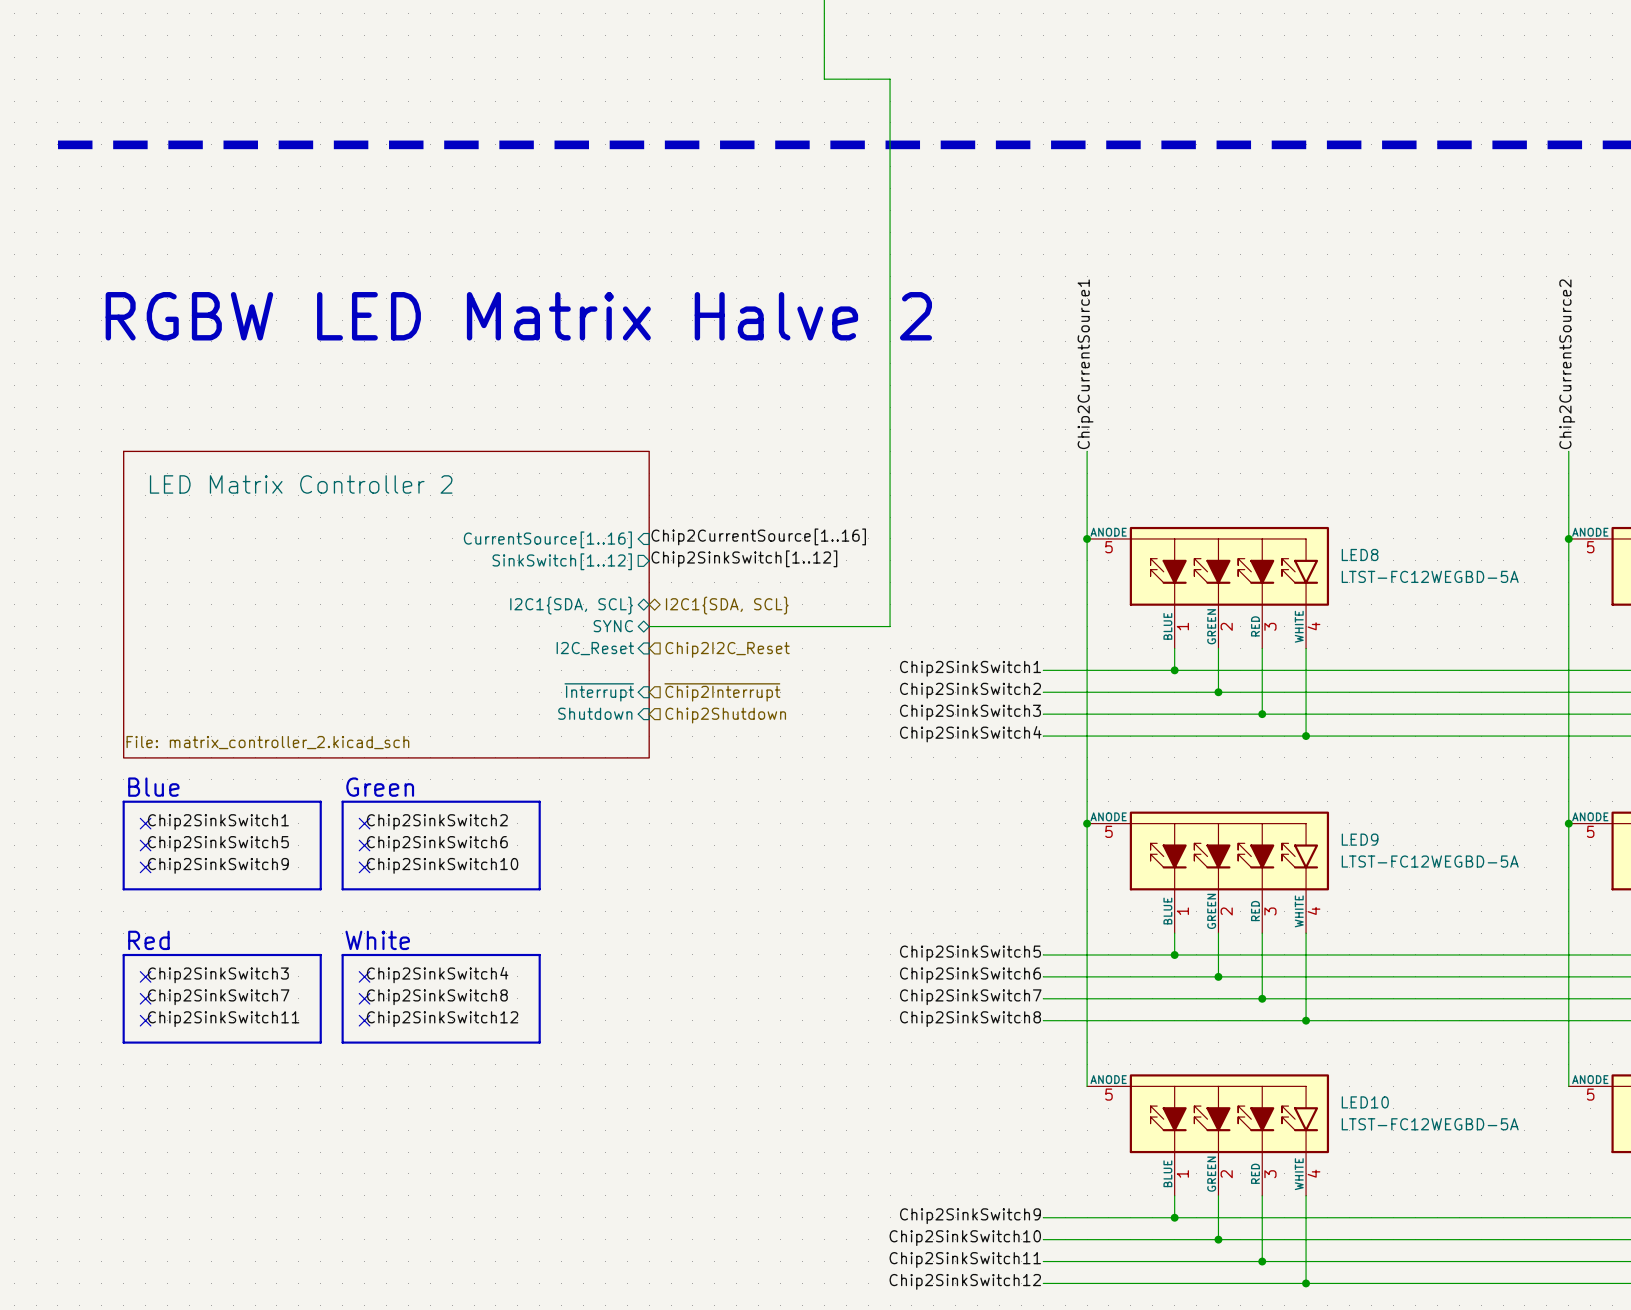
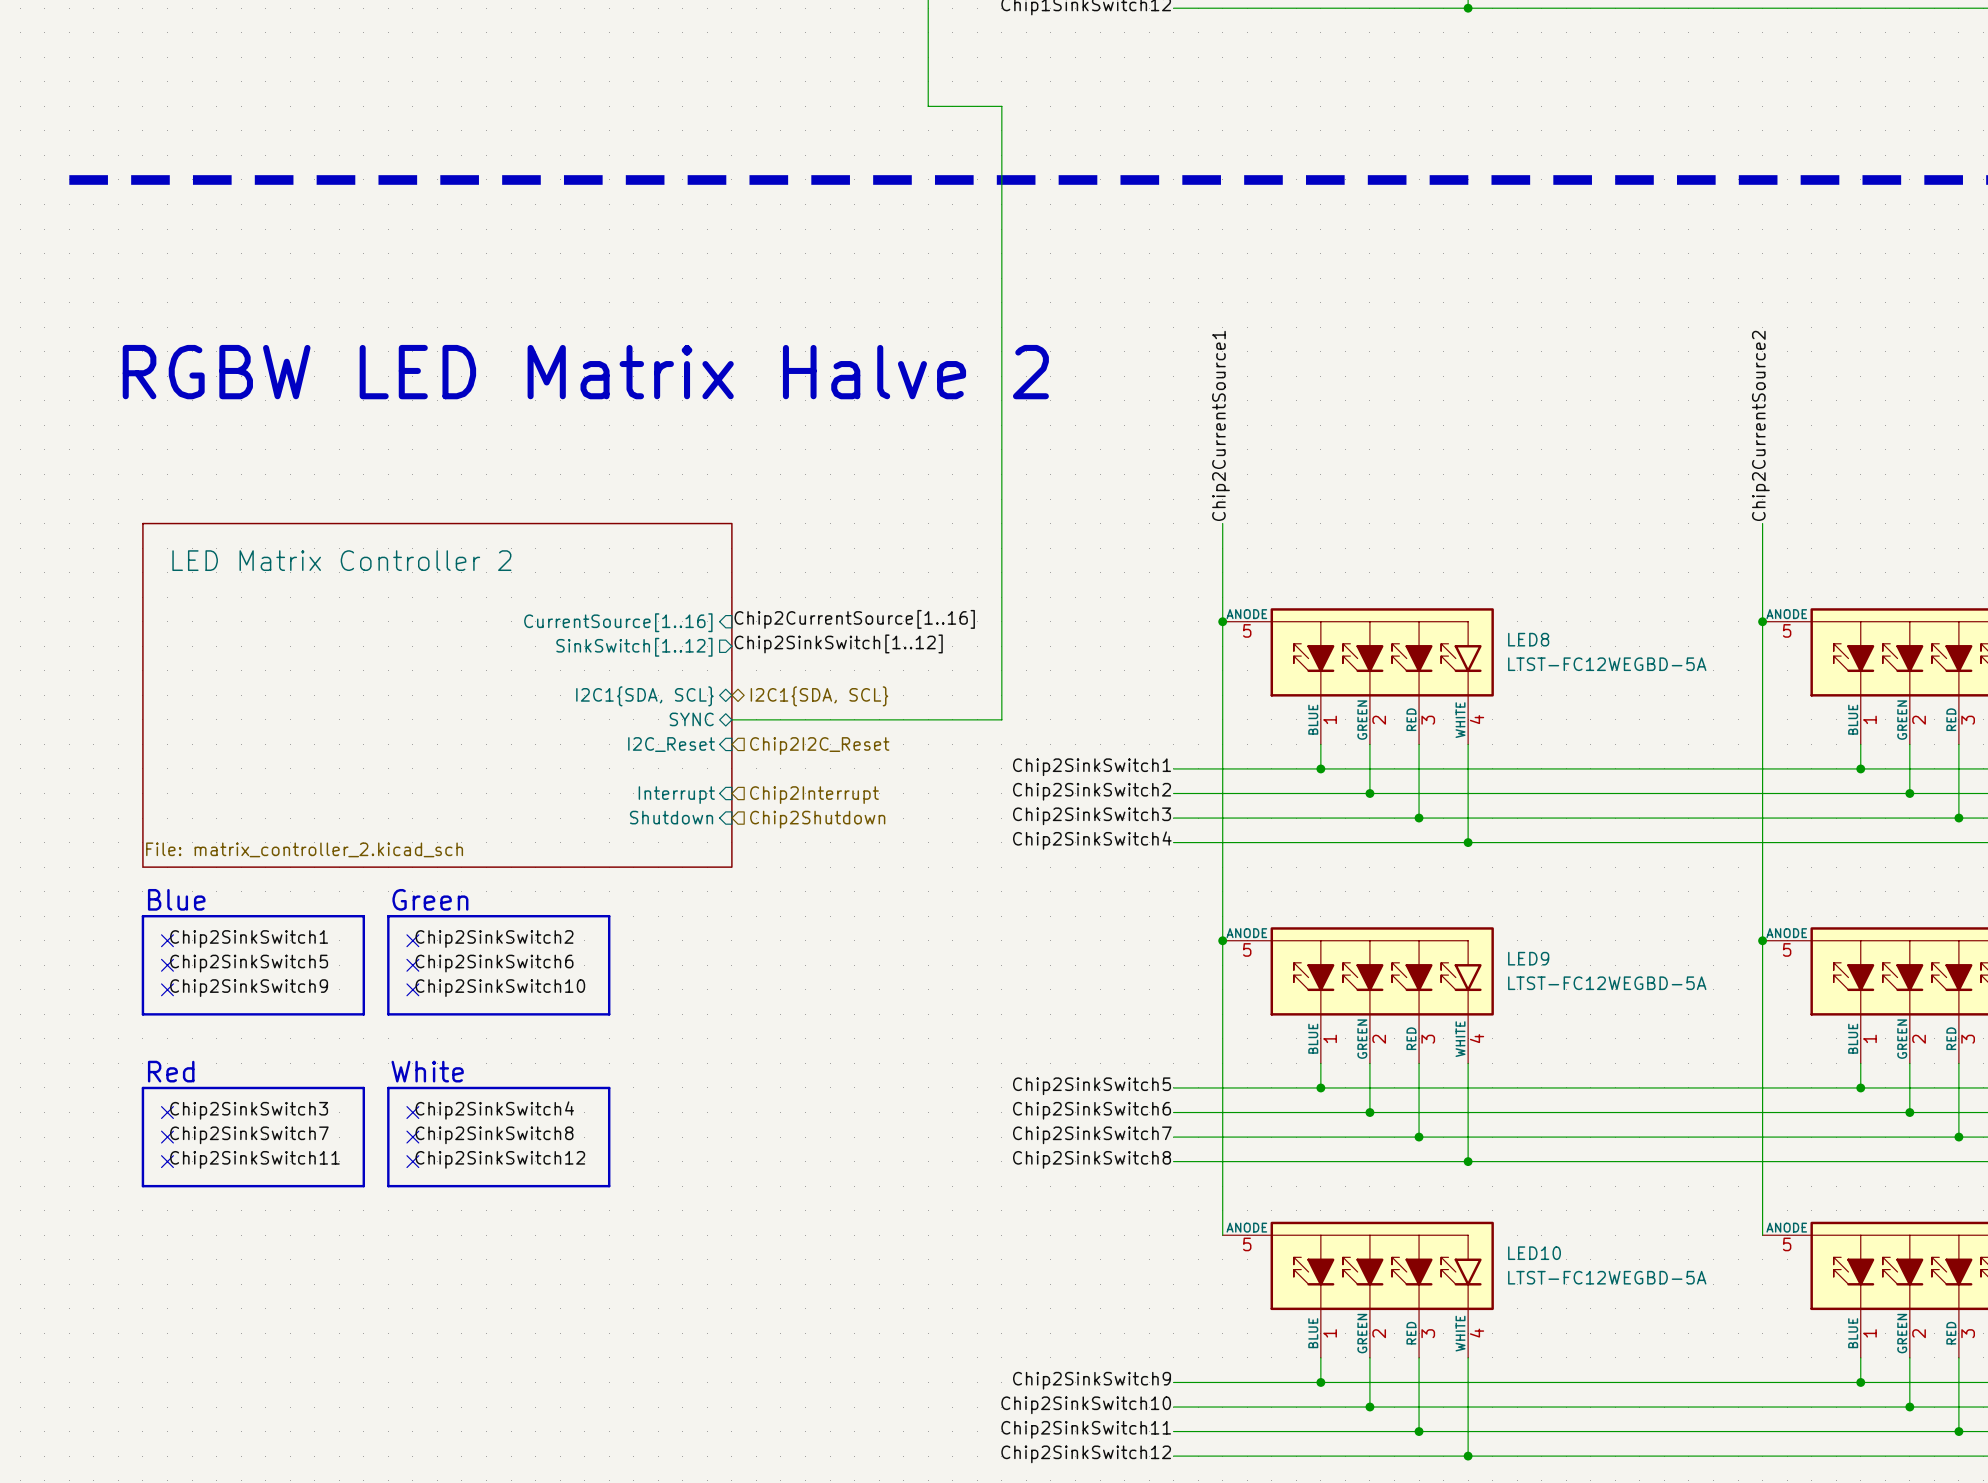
sheet pin: ~{Interrupt} (599, 692) -> Interrupt (676, 795)
hierarchical label: ~{Chip2Interrupt} (722, 692) -> Chip2Interrupt (814, 795)

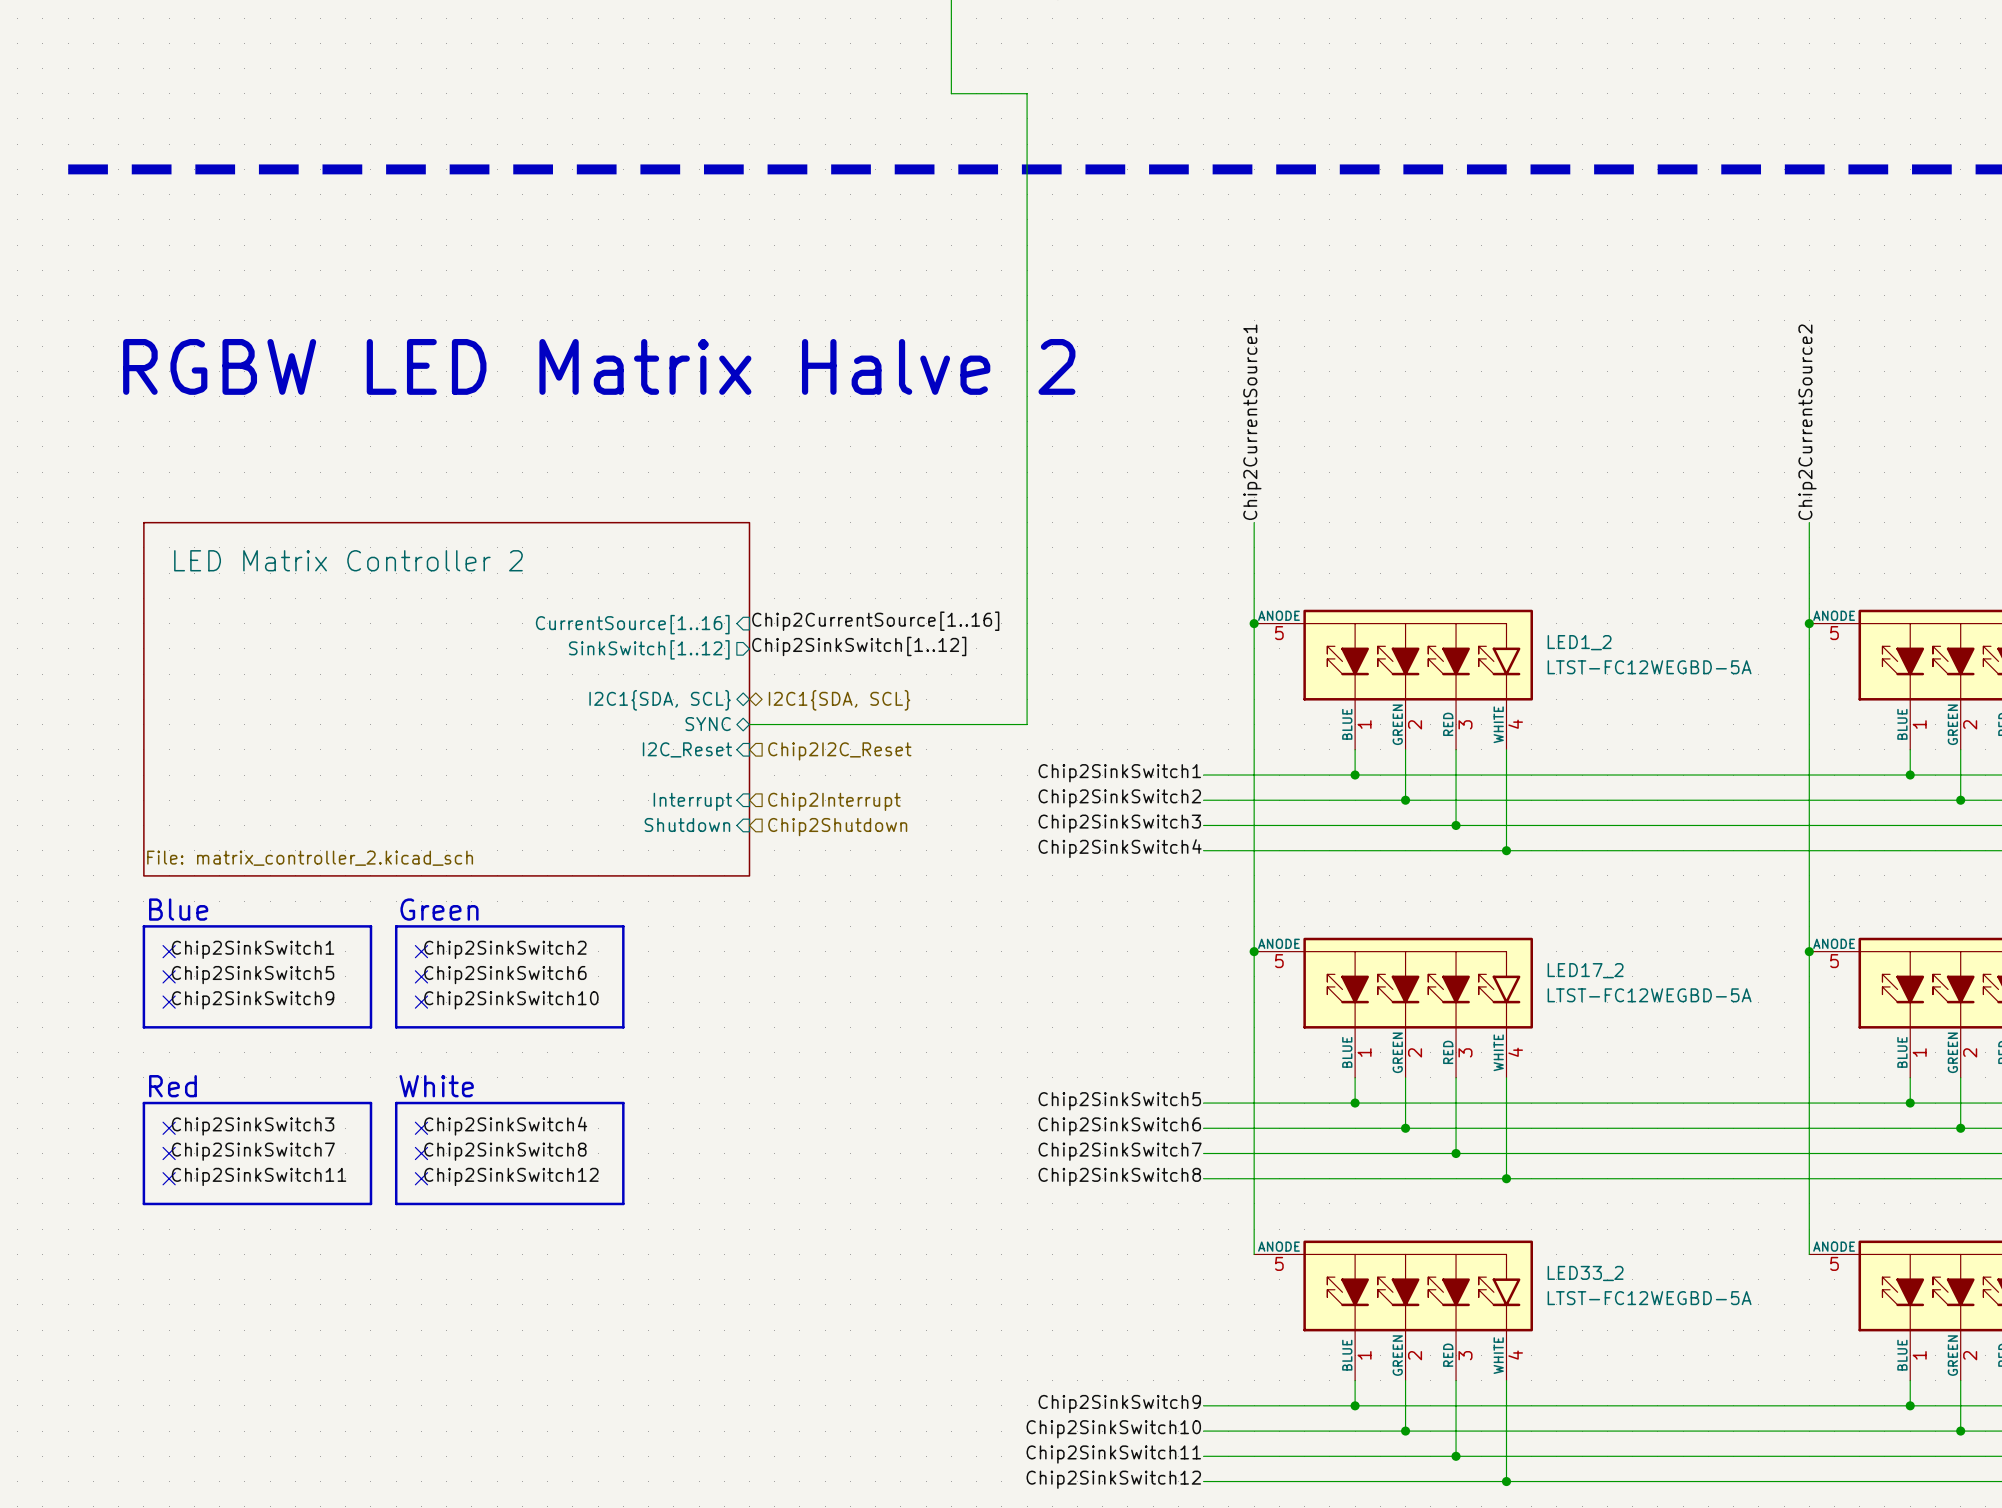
LED8 name: LED8 (1528, 639) -> LED1_2 (1579, 642)
LED9 name: LED9 (1528, 958) -> LED17_2 (1585, 970)
LED10 name: LED10 (1534, 1253) -> LED33_2 (1585, 1273)

